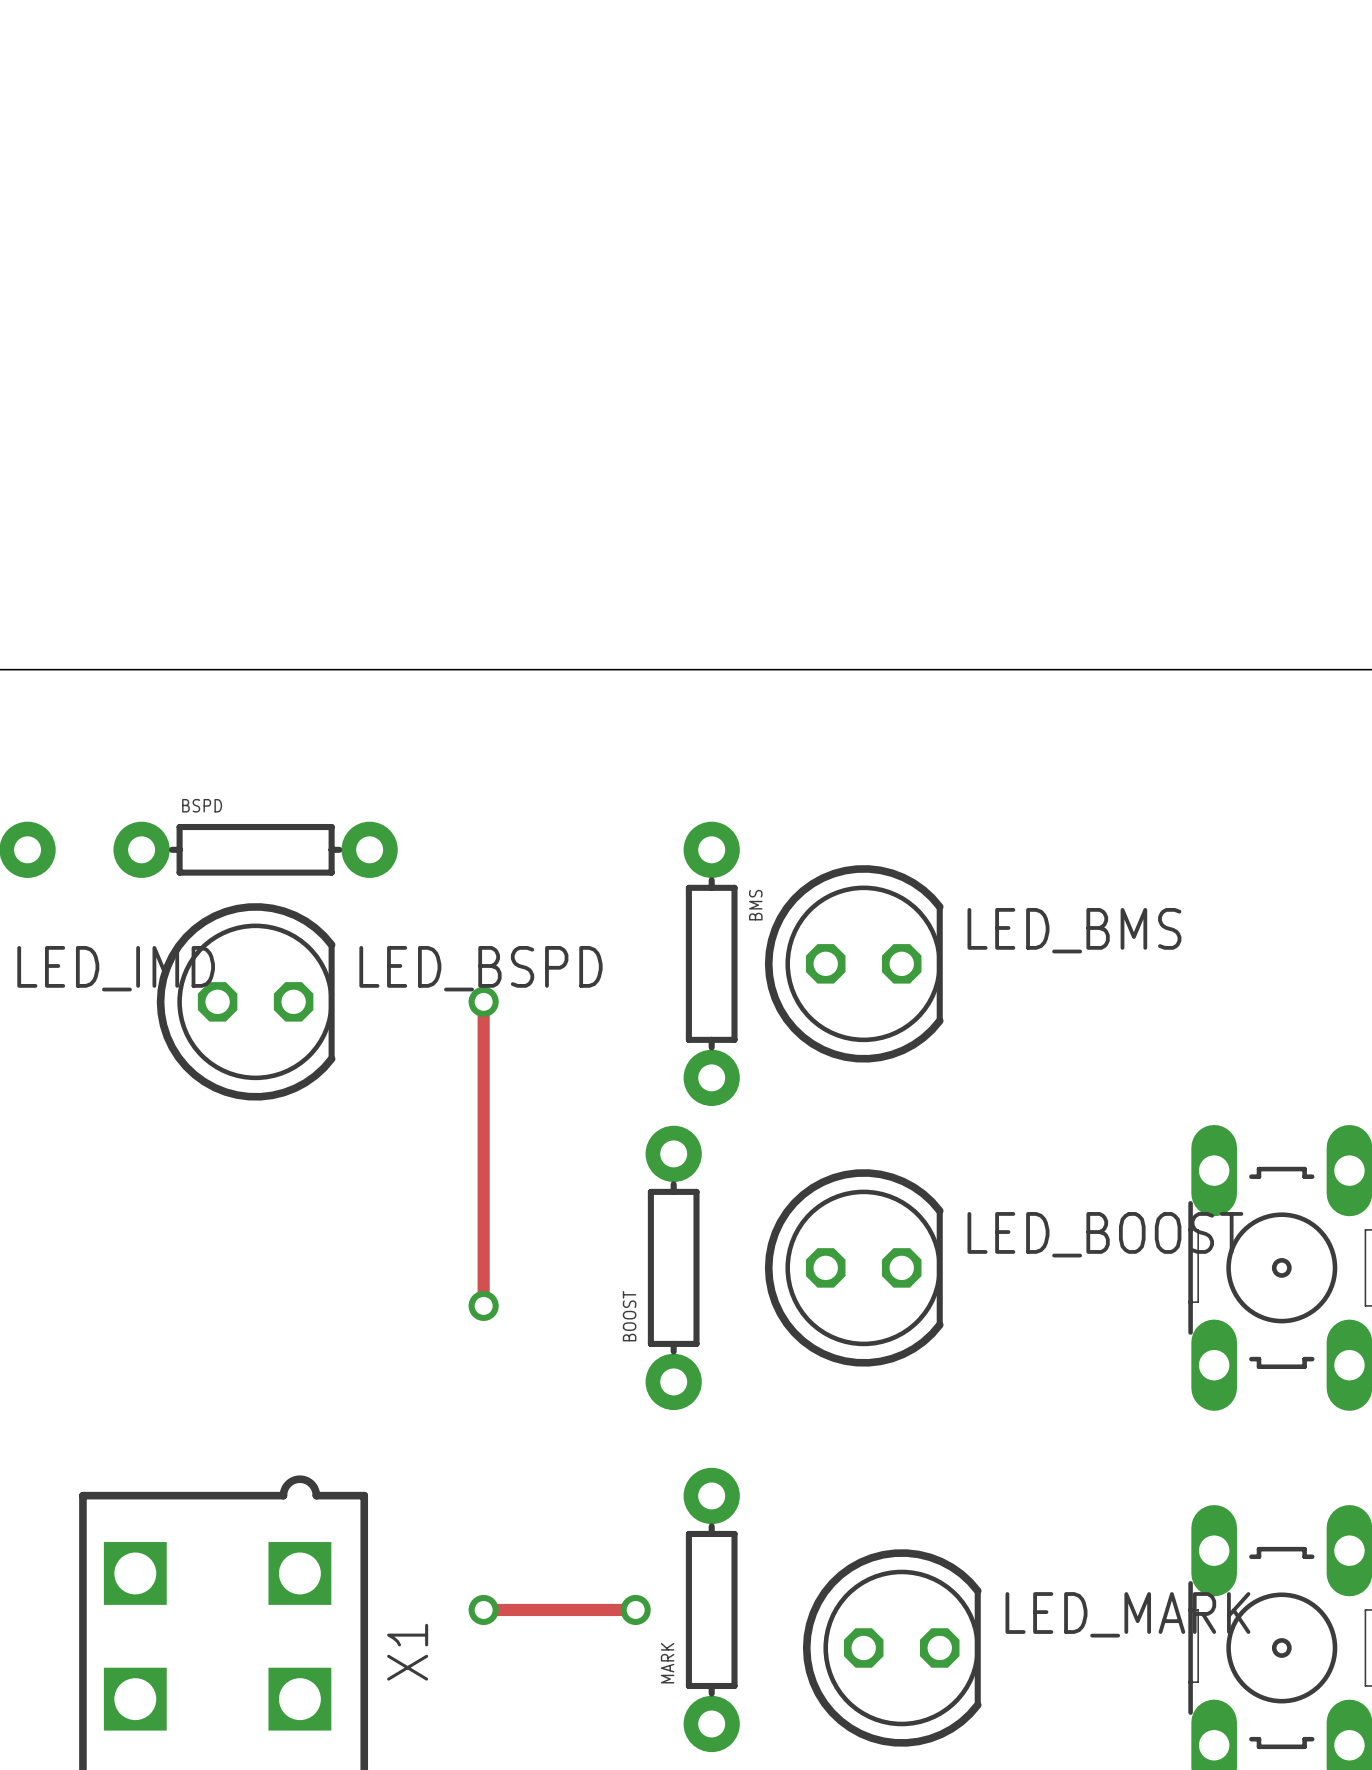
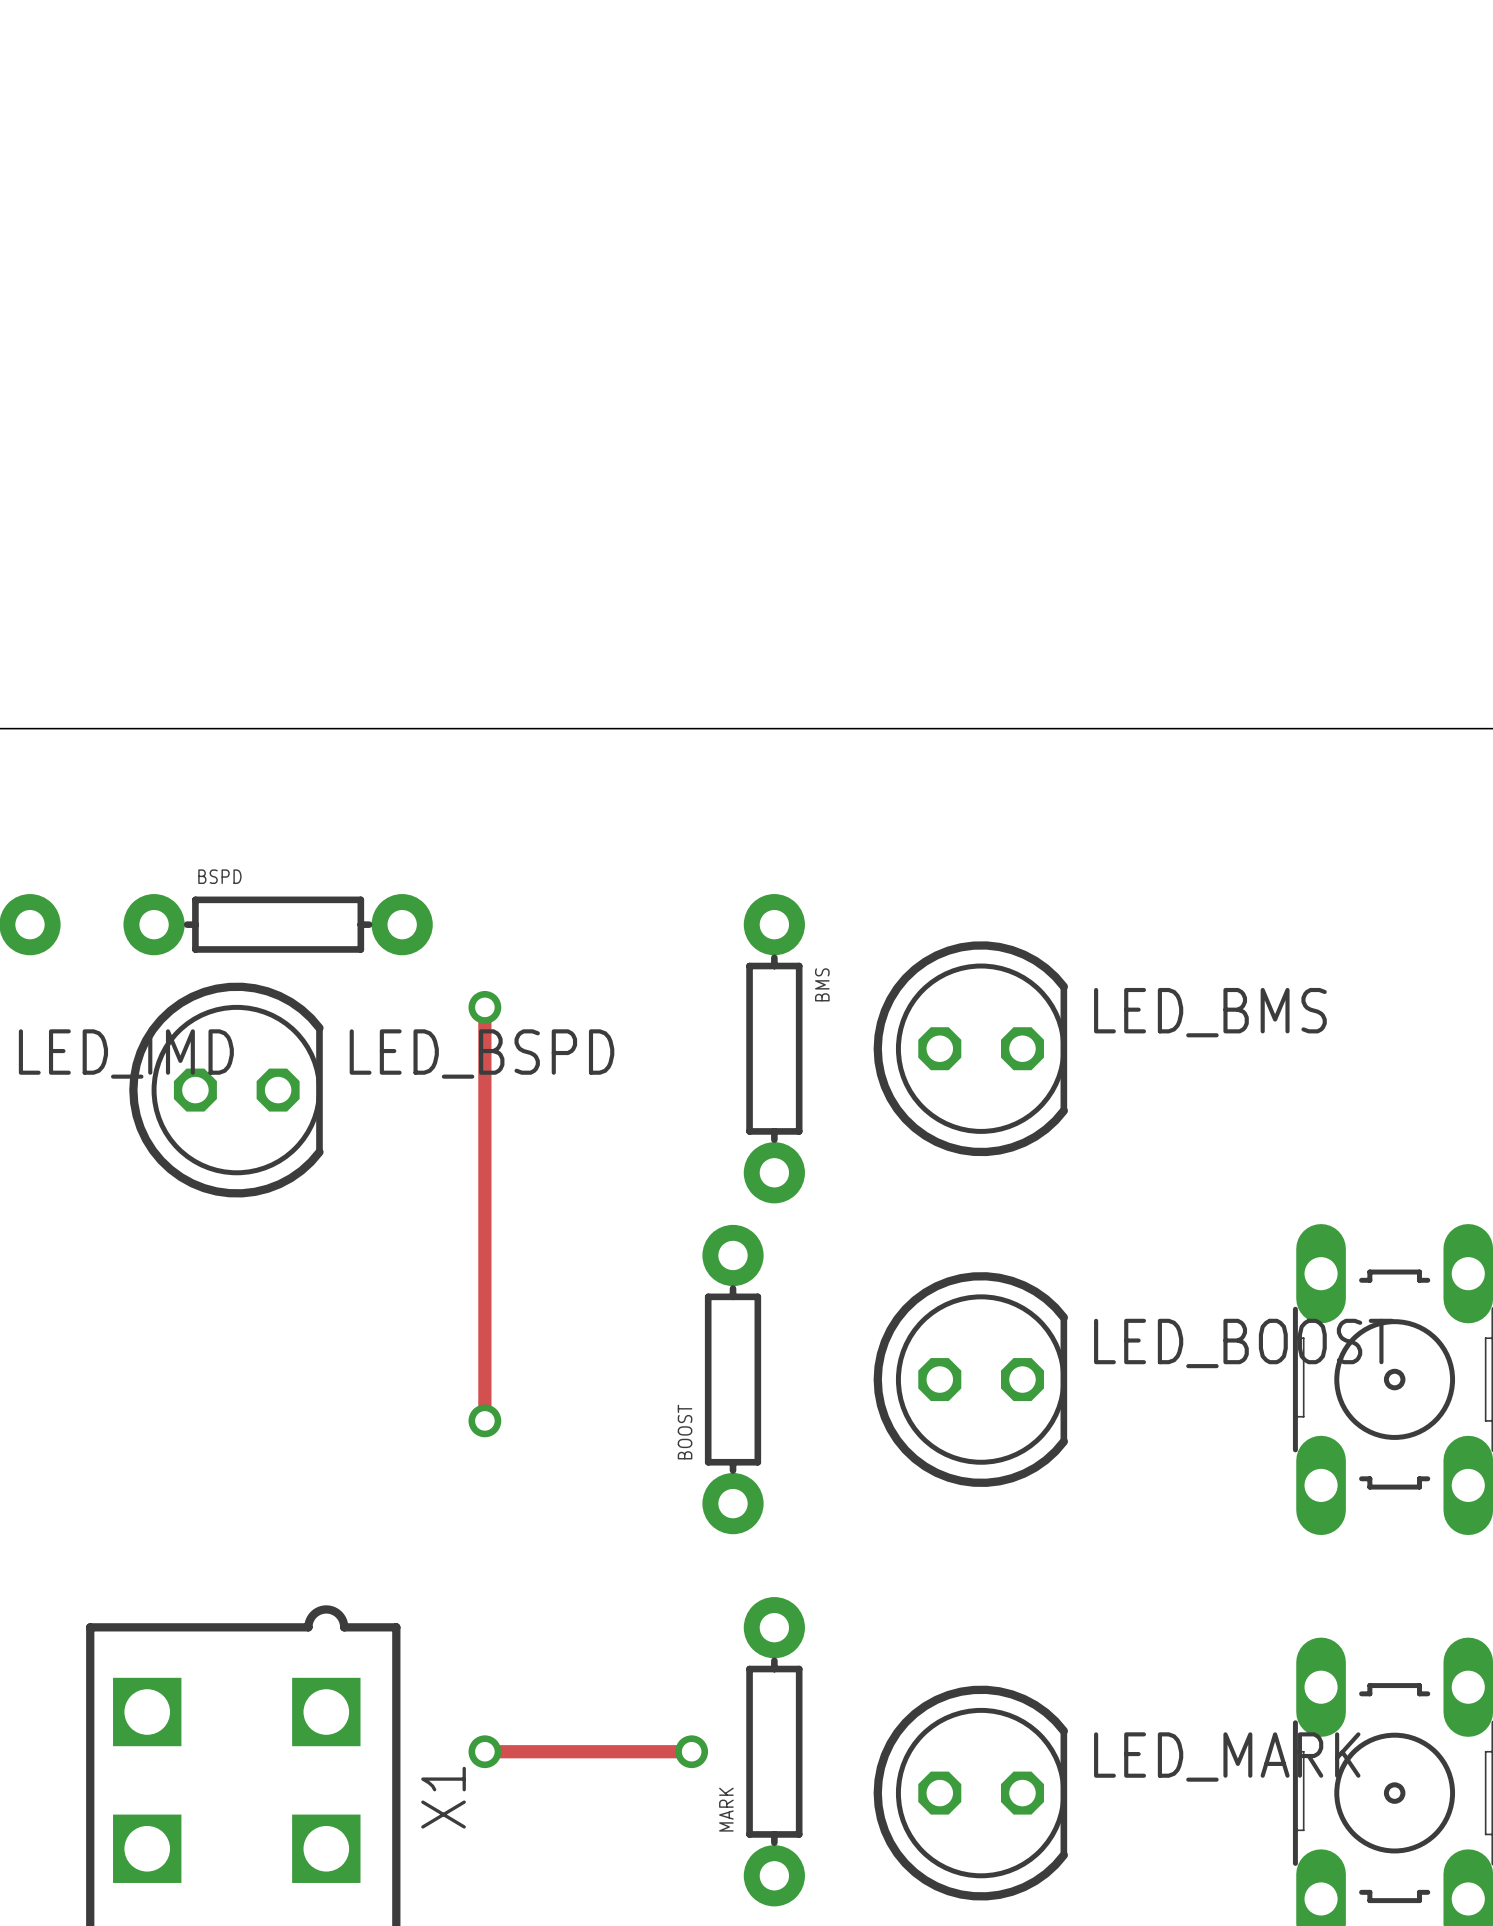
track: none -> (484, 1007) (484, 1420)
LED_BMS position: (854, 963) -> (970, 1048)
LED_BSPD position: (246, 1001) -> (226, 1090)
track: (483, 1001) (483, 1305) -> none
via position: (483, 1001) -> (484, 1007)
LED_BOOST position: (854, 1267) -> (970, 1379)
via position: (483, 1305) -> (484, 1420)
track: none -> (484, 1751) (526, 1751)
via position: (483, 1609) -> (484, 1751)

